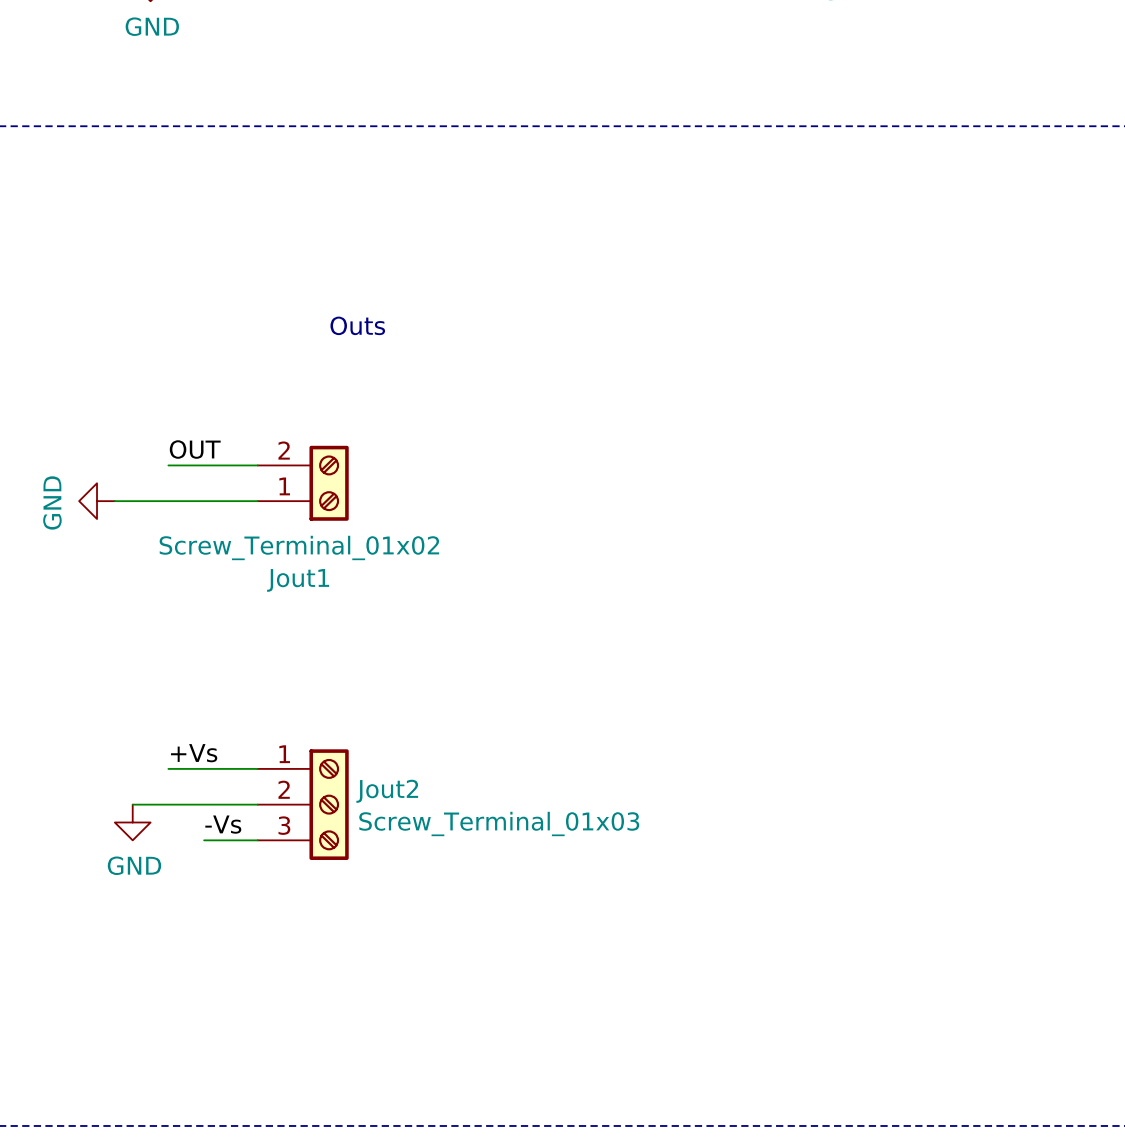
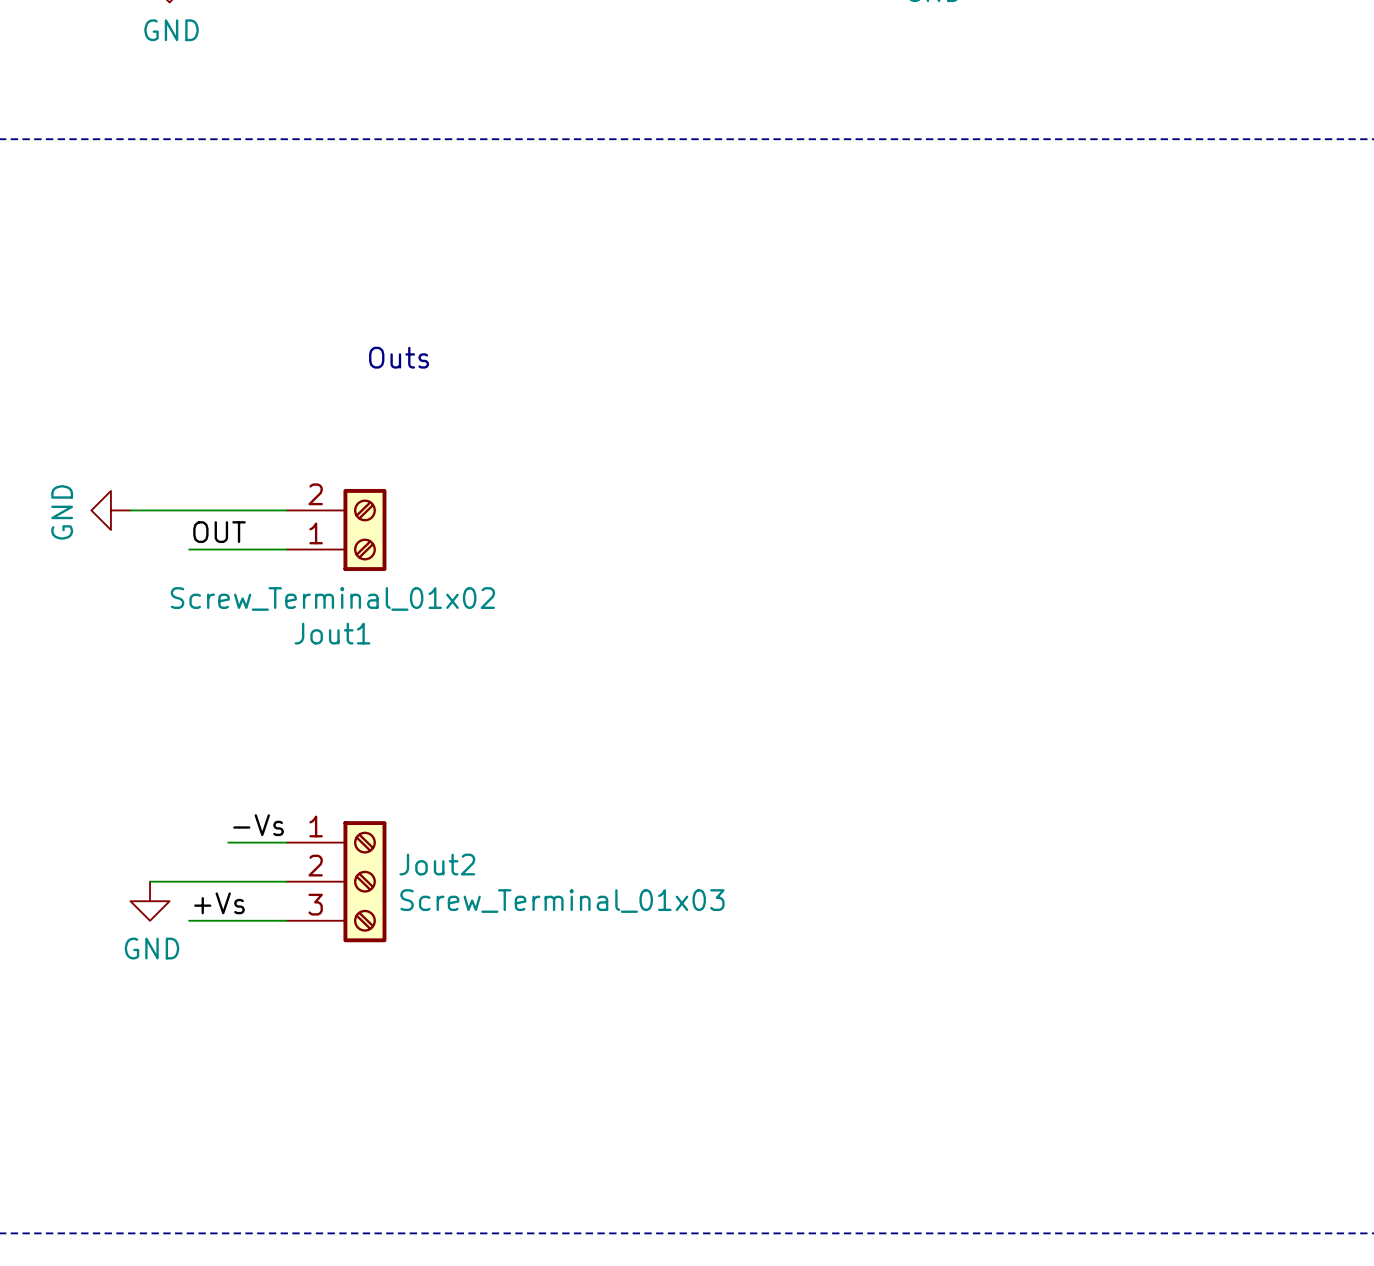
label position: OUT (195, 449) -> OUT (219, 532)
power symbol position: GND (97, 501) -> GND (110, 510)
wire: (114, 501) (168, 501) -> (130, 510) (189, 510)
label position: +Vs (194, 753) -> +Vs (219, 903)
wire: (168, 768) (204, 768) -> (189, 920) (228, 920)
label position: -Vs (223, 824) -> -Vs (258, 825)

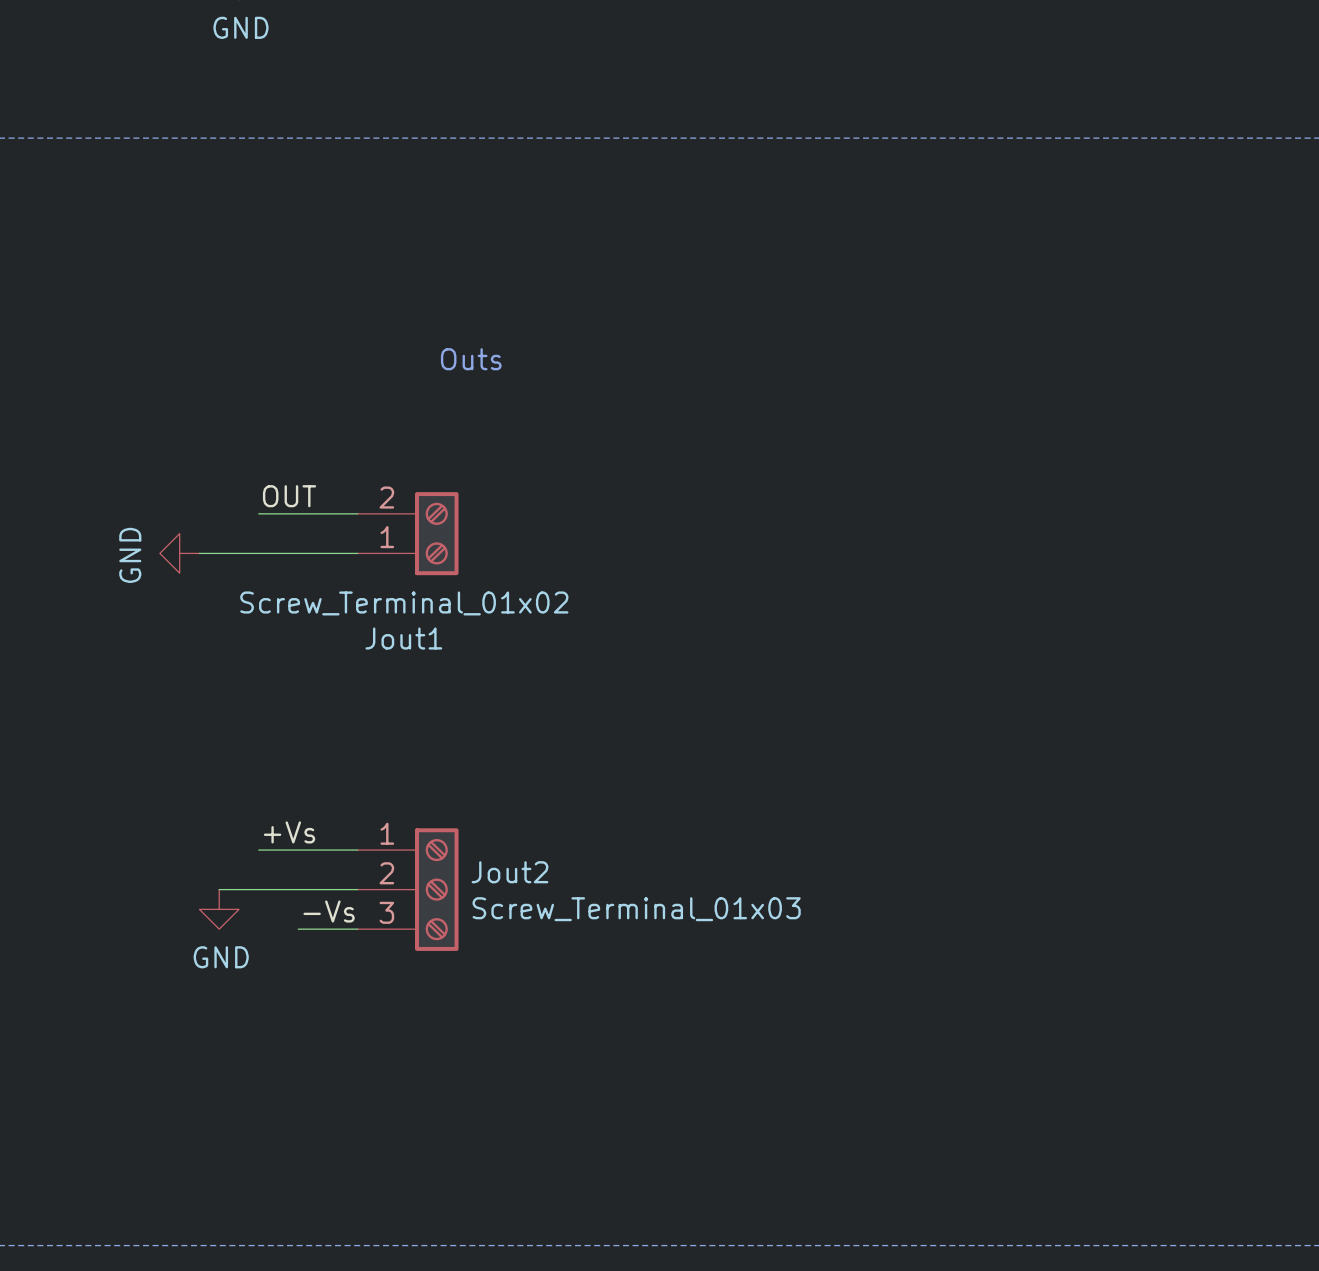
power symbol position: GND (110, 510) -> GND (179, 553)
wire: (130, 510) (189, 510) -> (199, 553) (258, 553)
label position: OUT (219, 532) -> OUT (289, 496)
label position: -Vs (258, 825) -> -Vs (329, 911)
label position: +Vs (219, 903) -> +Vs (289, 832)
wire: (189, 920) (228, 920) -> (258, 850) (298, 850)

